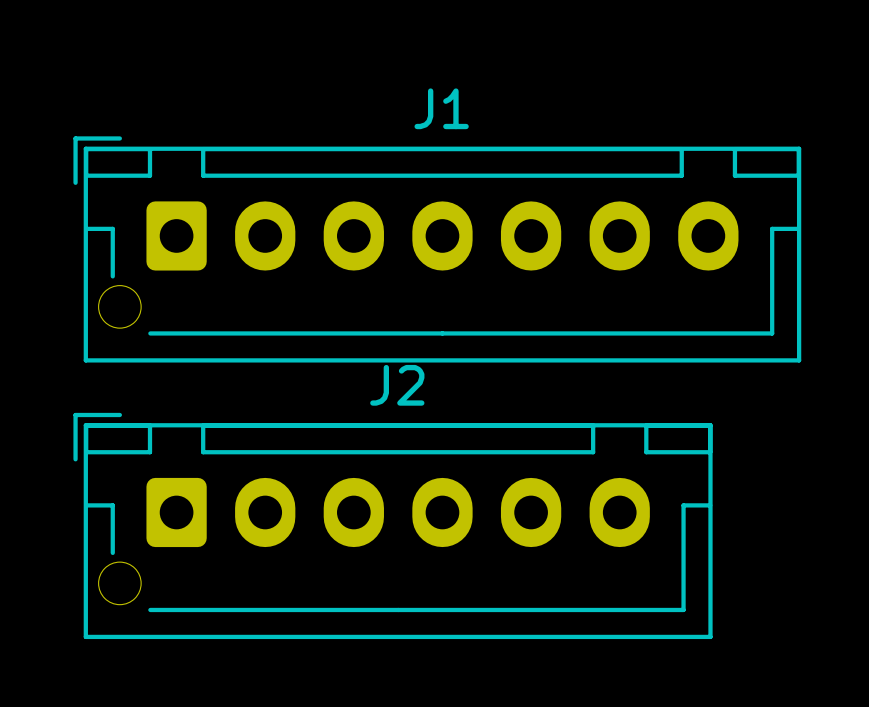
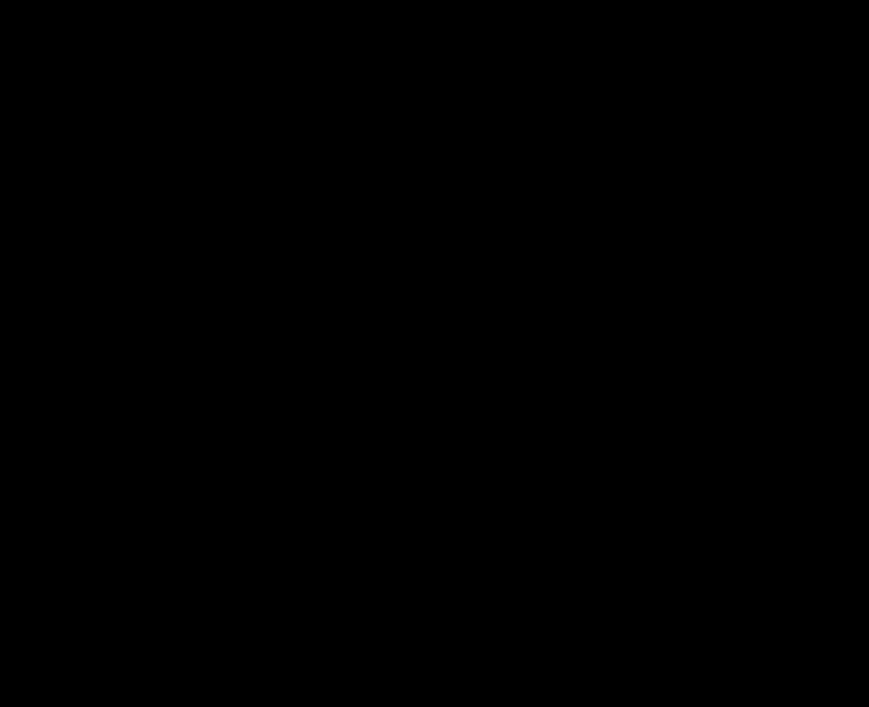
J1: (437, 249) -> none
J2: (393, 525) -> none

